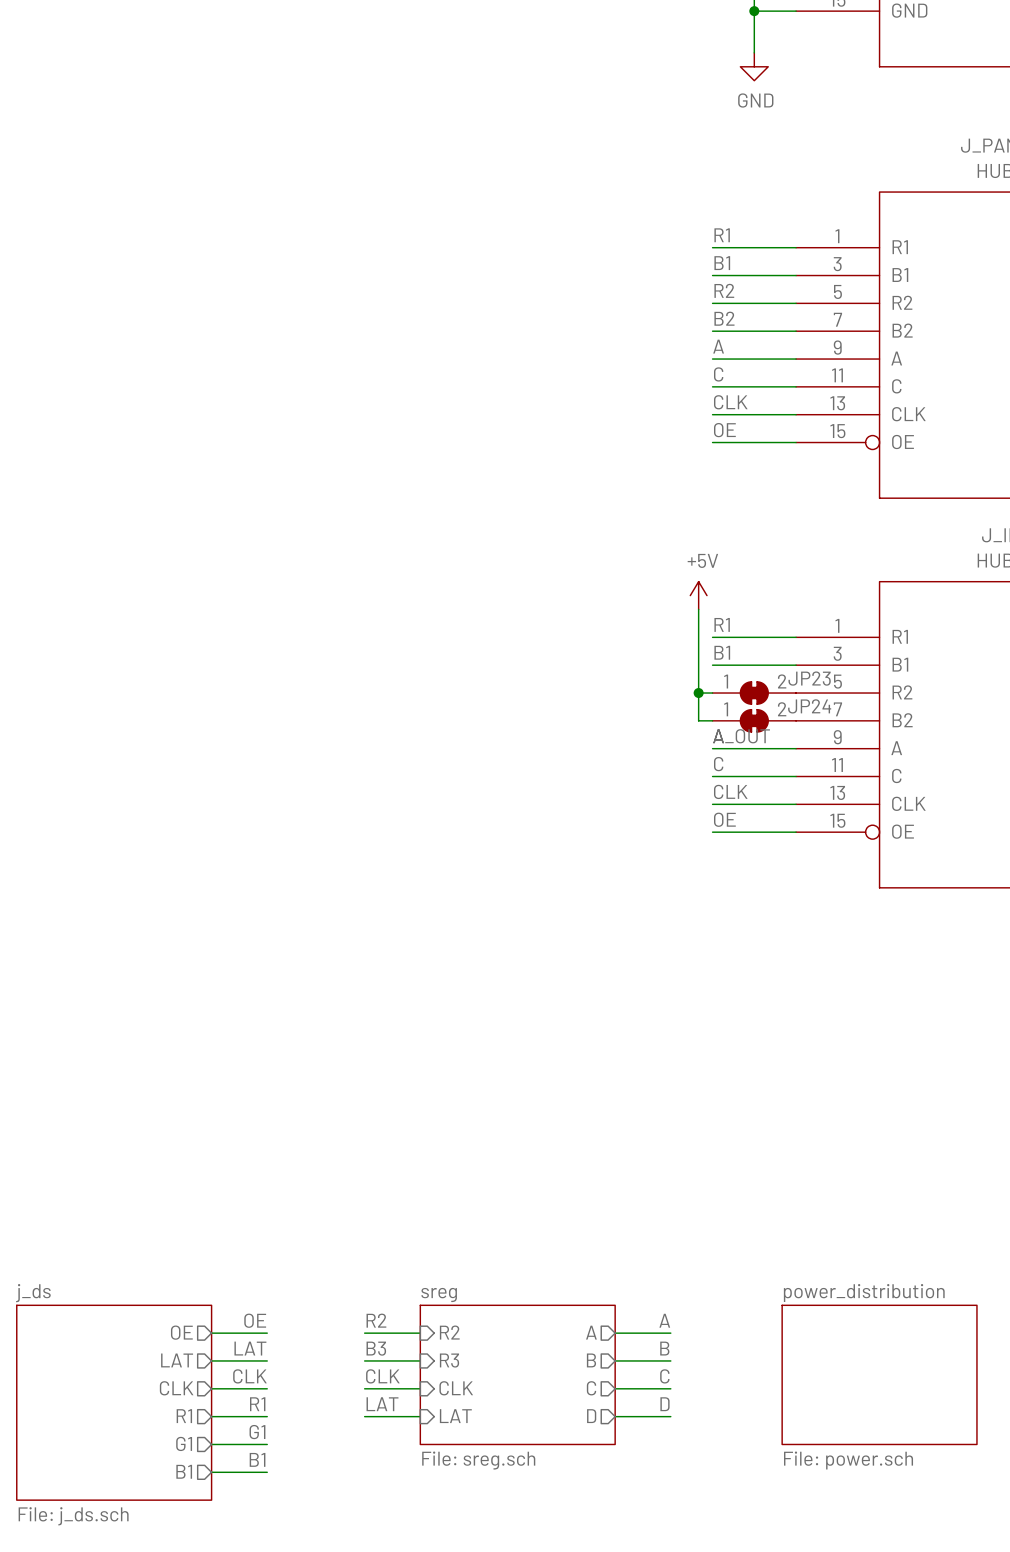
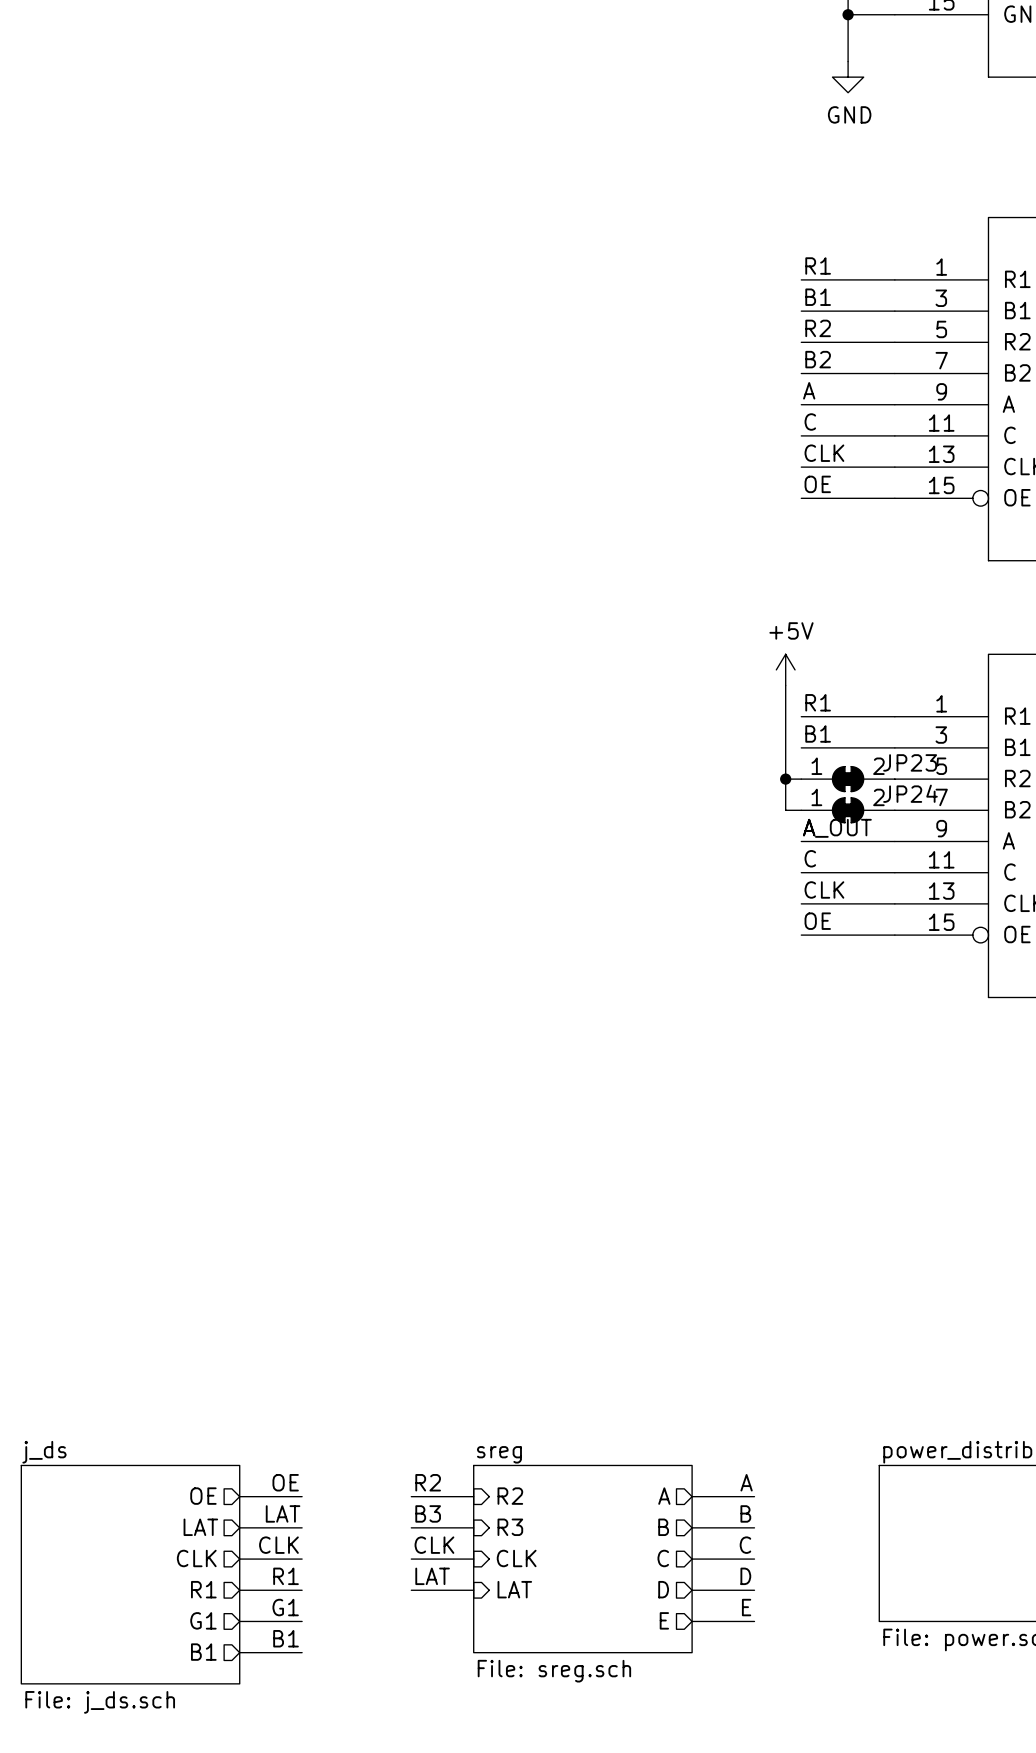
sheet sreg: File: sreg.sch (517, 1374) -> none
sheet sreg: none -> File: sreg.sch (582, 1559)
label: none -> E (746, 1607)
sheet pin: none -> E (664, 1620)
wire: none -> (692, 1621) (754, 1621)

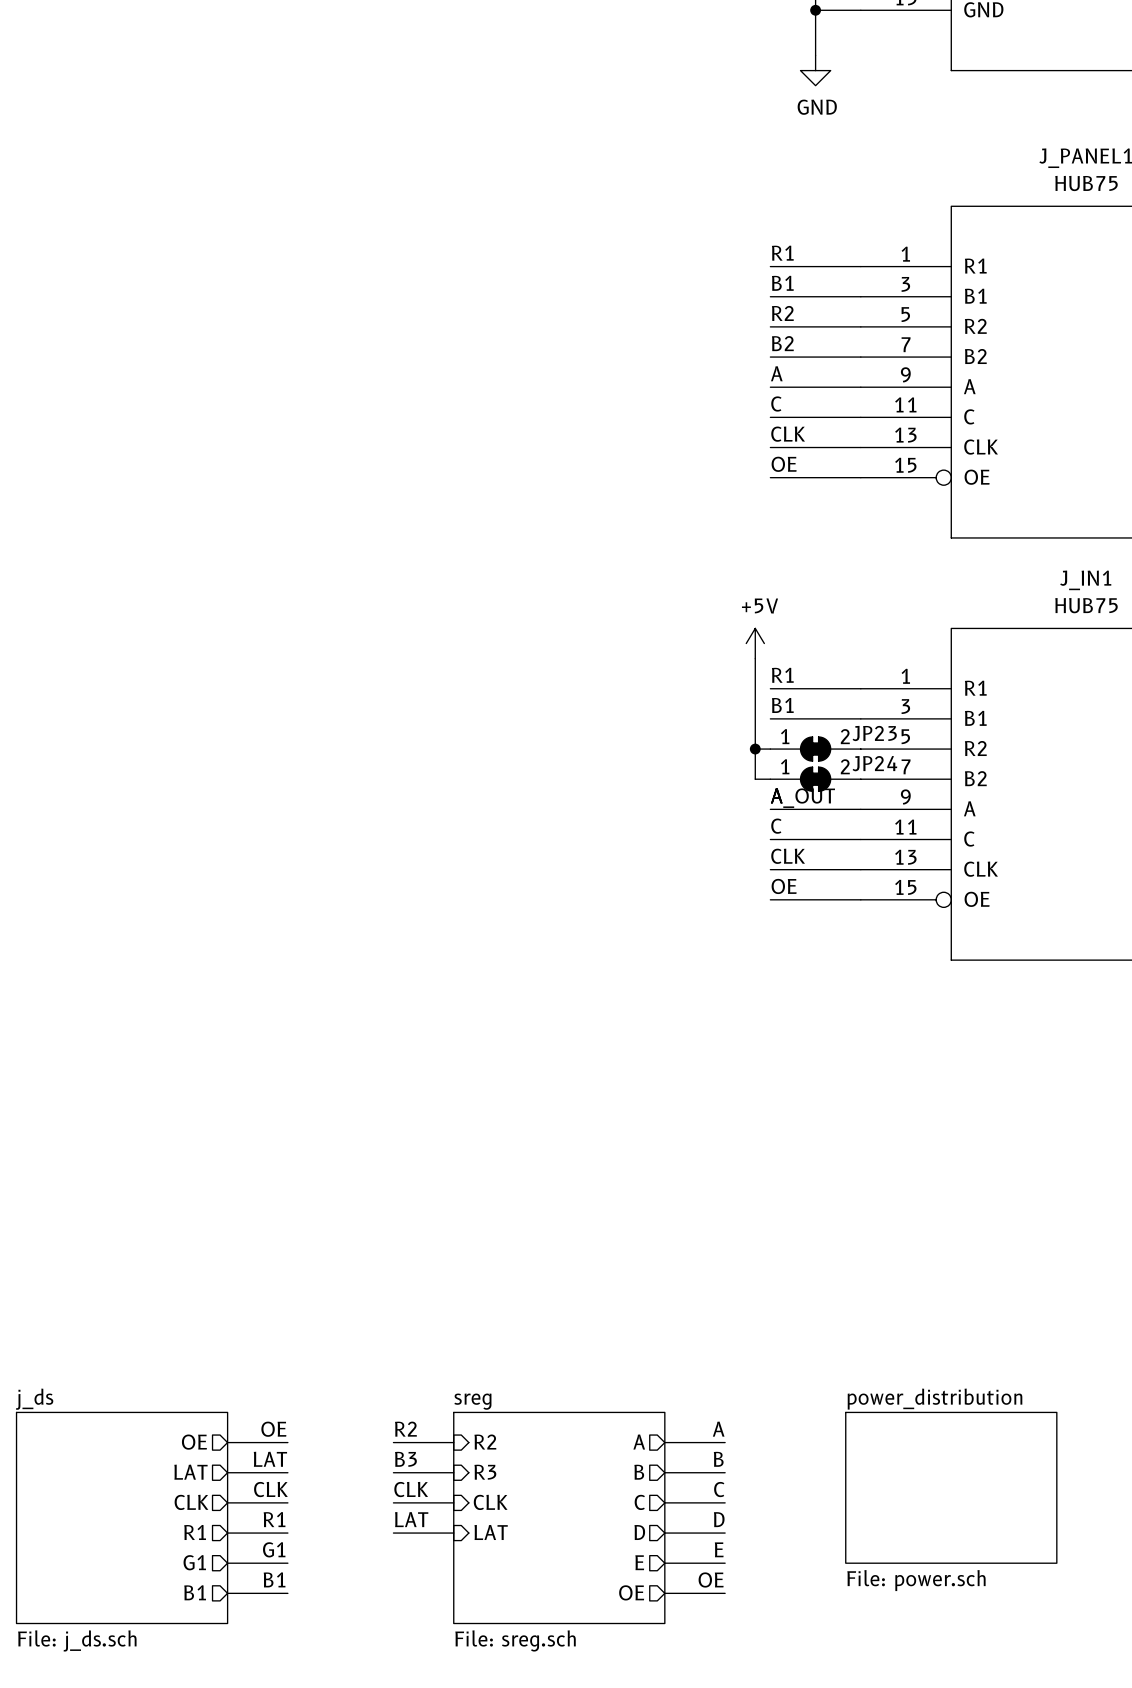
sheet sreg: File: sreg.sch (582, 1559) -> none
sheet sreg: none -> File: sreg.sch (559, 1517)
label: none -> OE (711, 1579)
sheet pin: none -> OE (631, 1592)
wire: none -> (664, 1593) (725, 1593)

